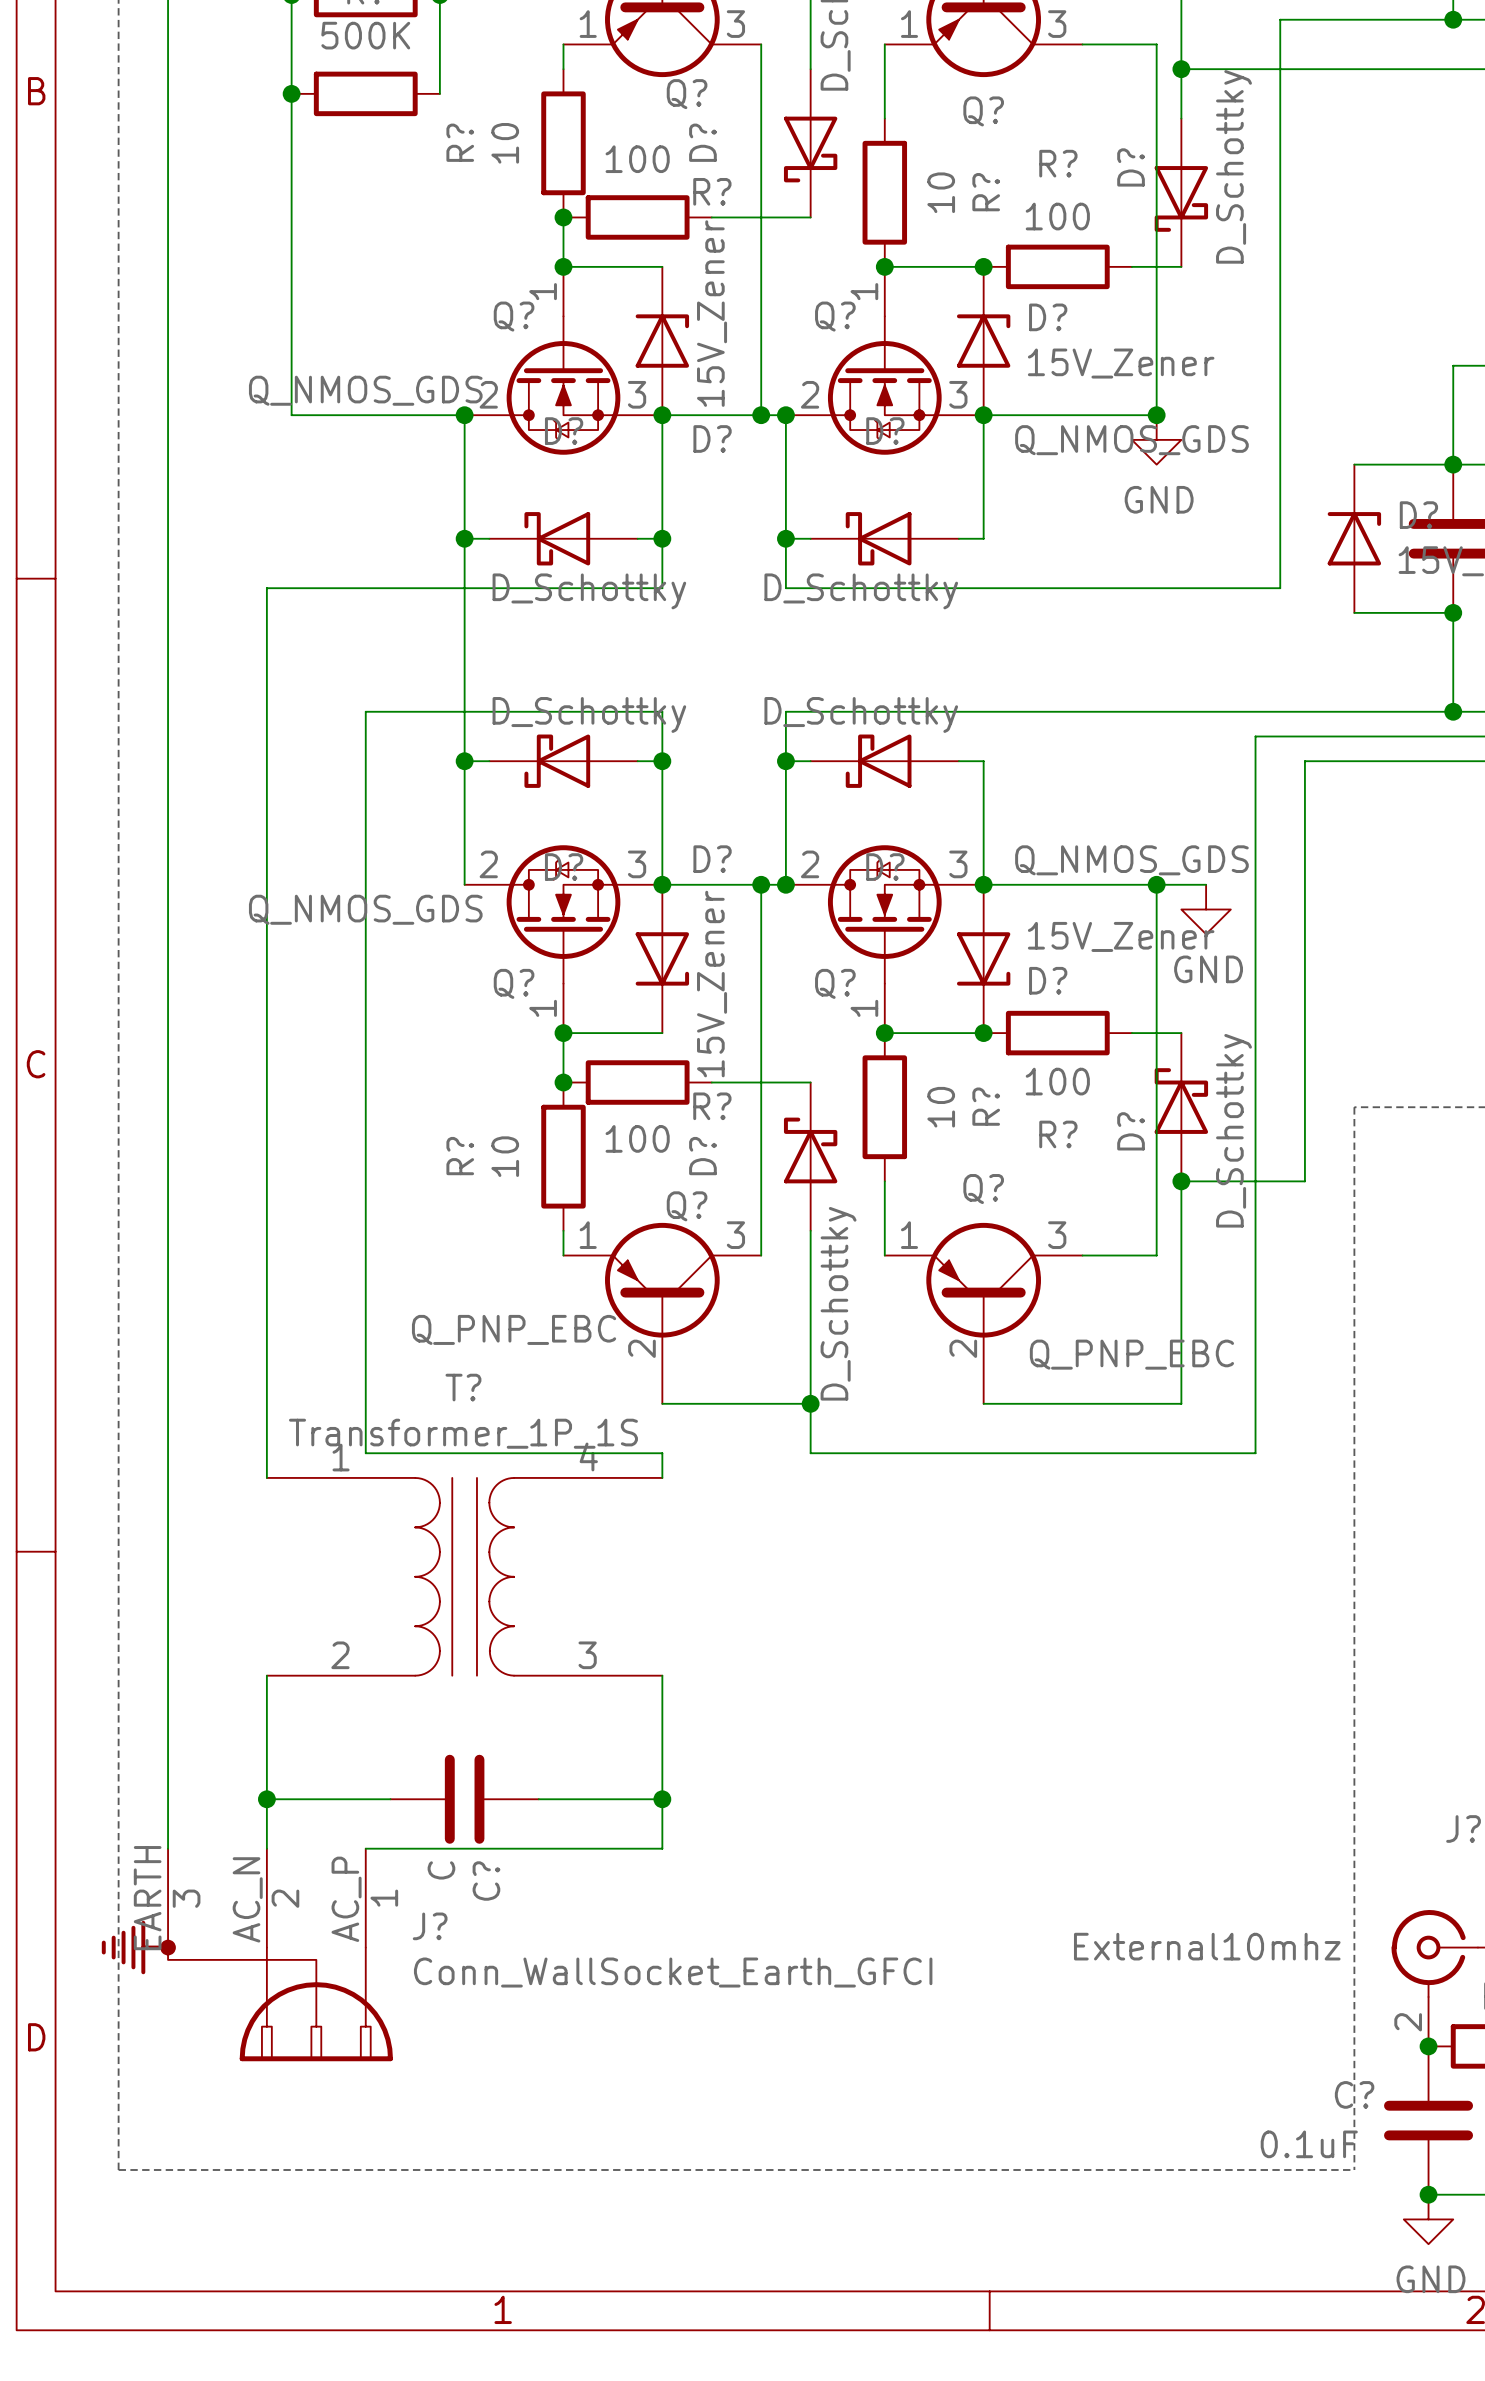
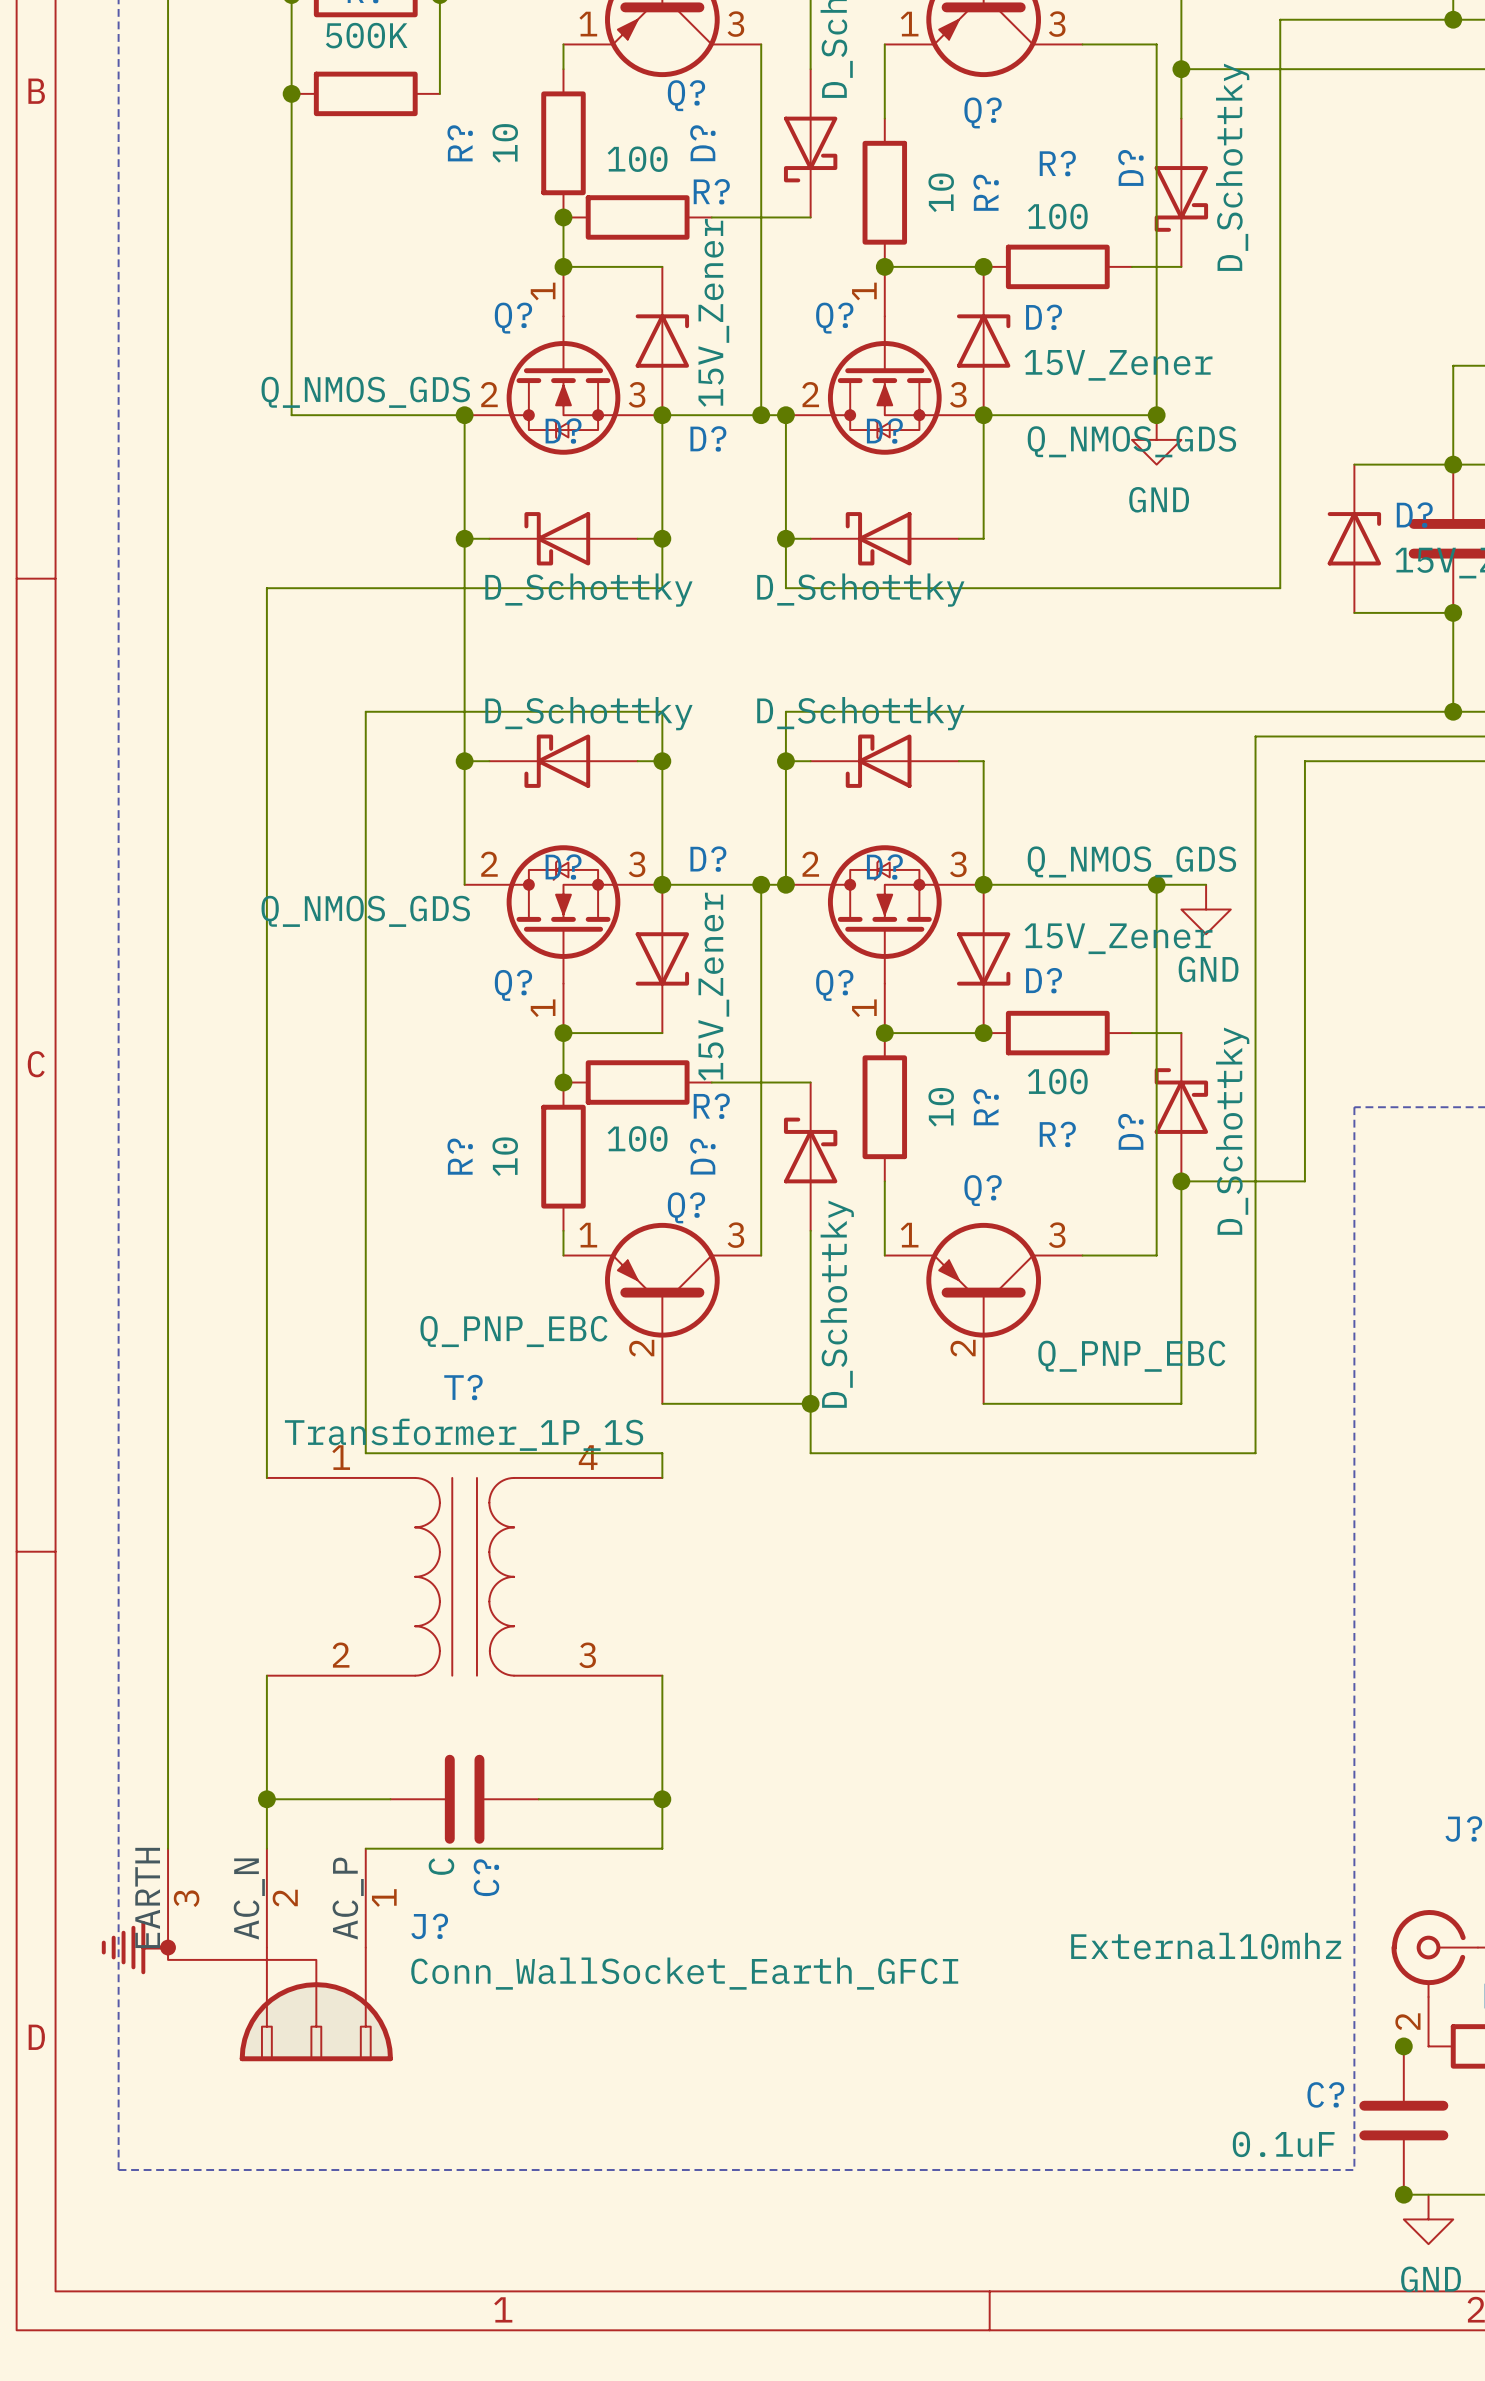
junction position: (1428, 2046) -> (1403, 2046)
C? position: (1428, 2120) -> (1403, 2120)
wire: none -> (1403, 2194) (1428, 2194)
junction position: (1428, 2194) -> (1403, 2194)

